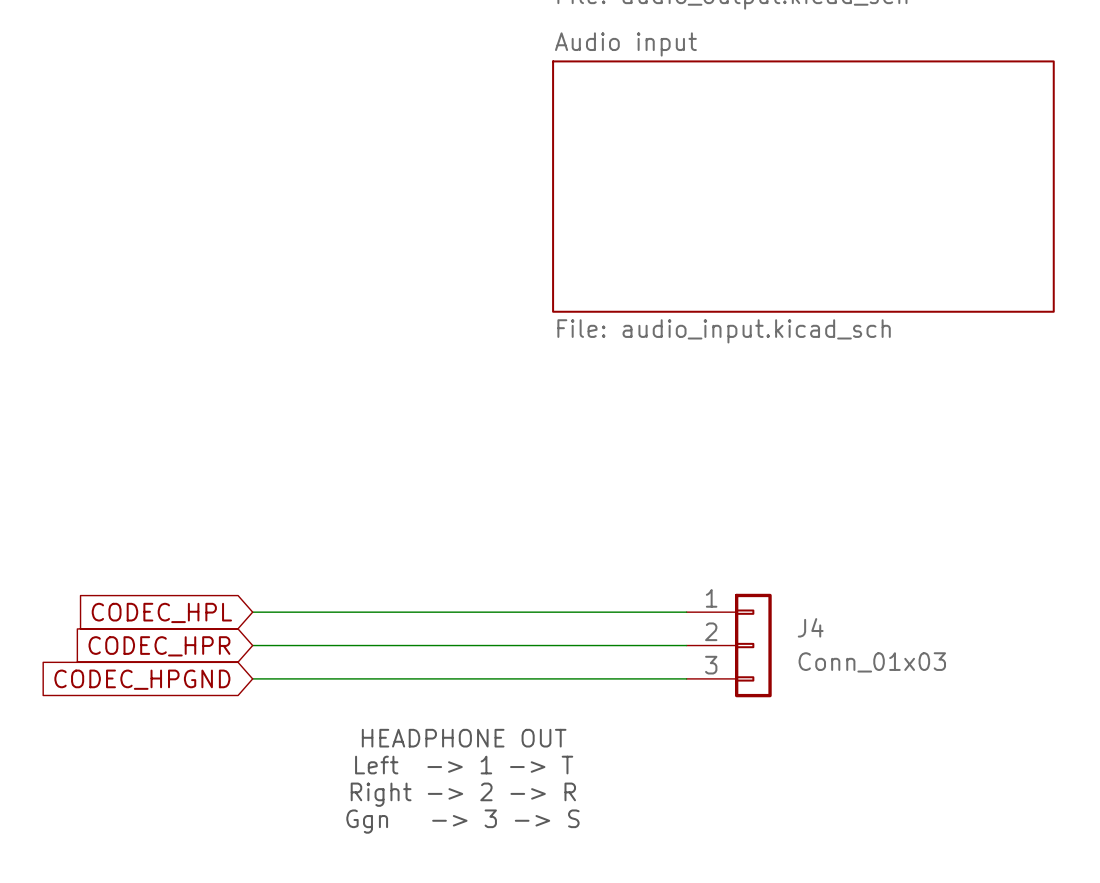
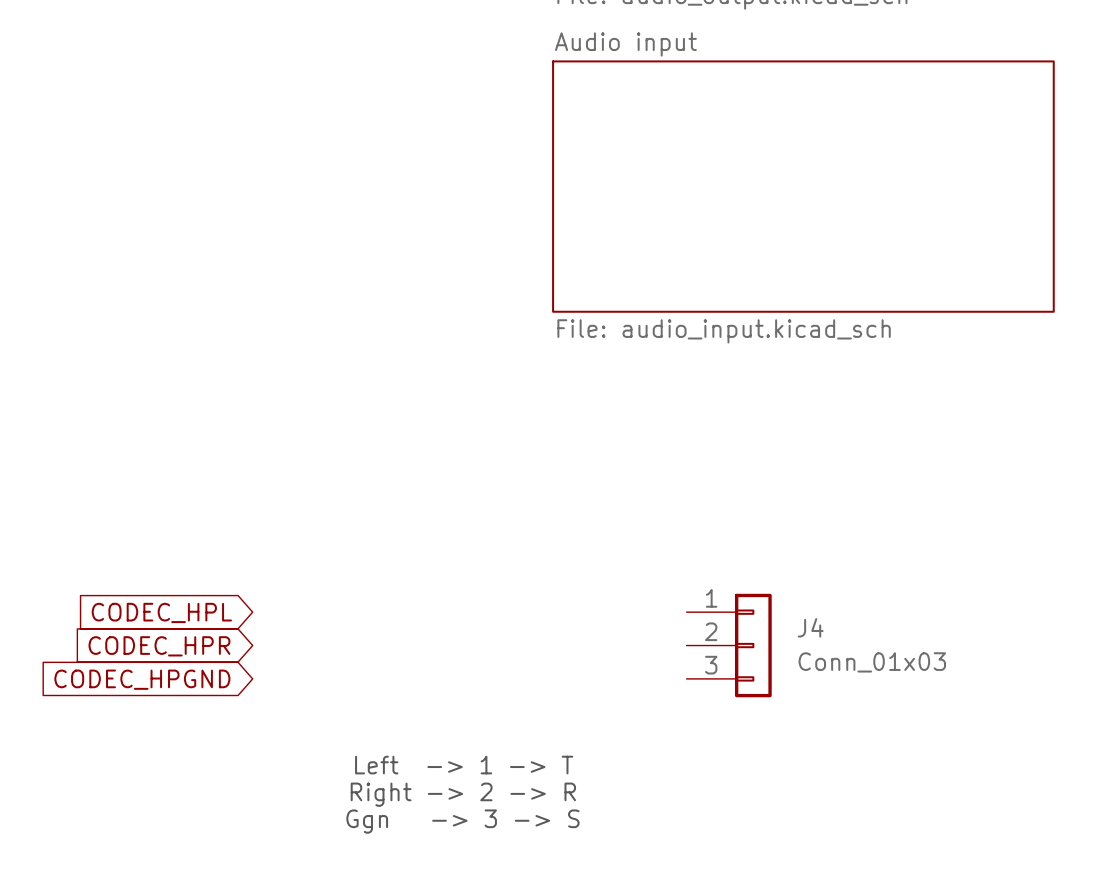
wire: (252, 612) (686, 612) -> none
wire: (252, 645) (686, 645) -> none
wire: (252, 678) (686, 678) -> none
text: HEADPHONE OUT (464, 738) -> none

